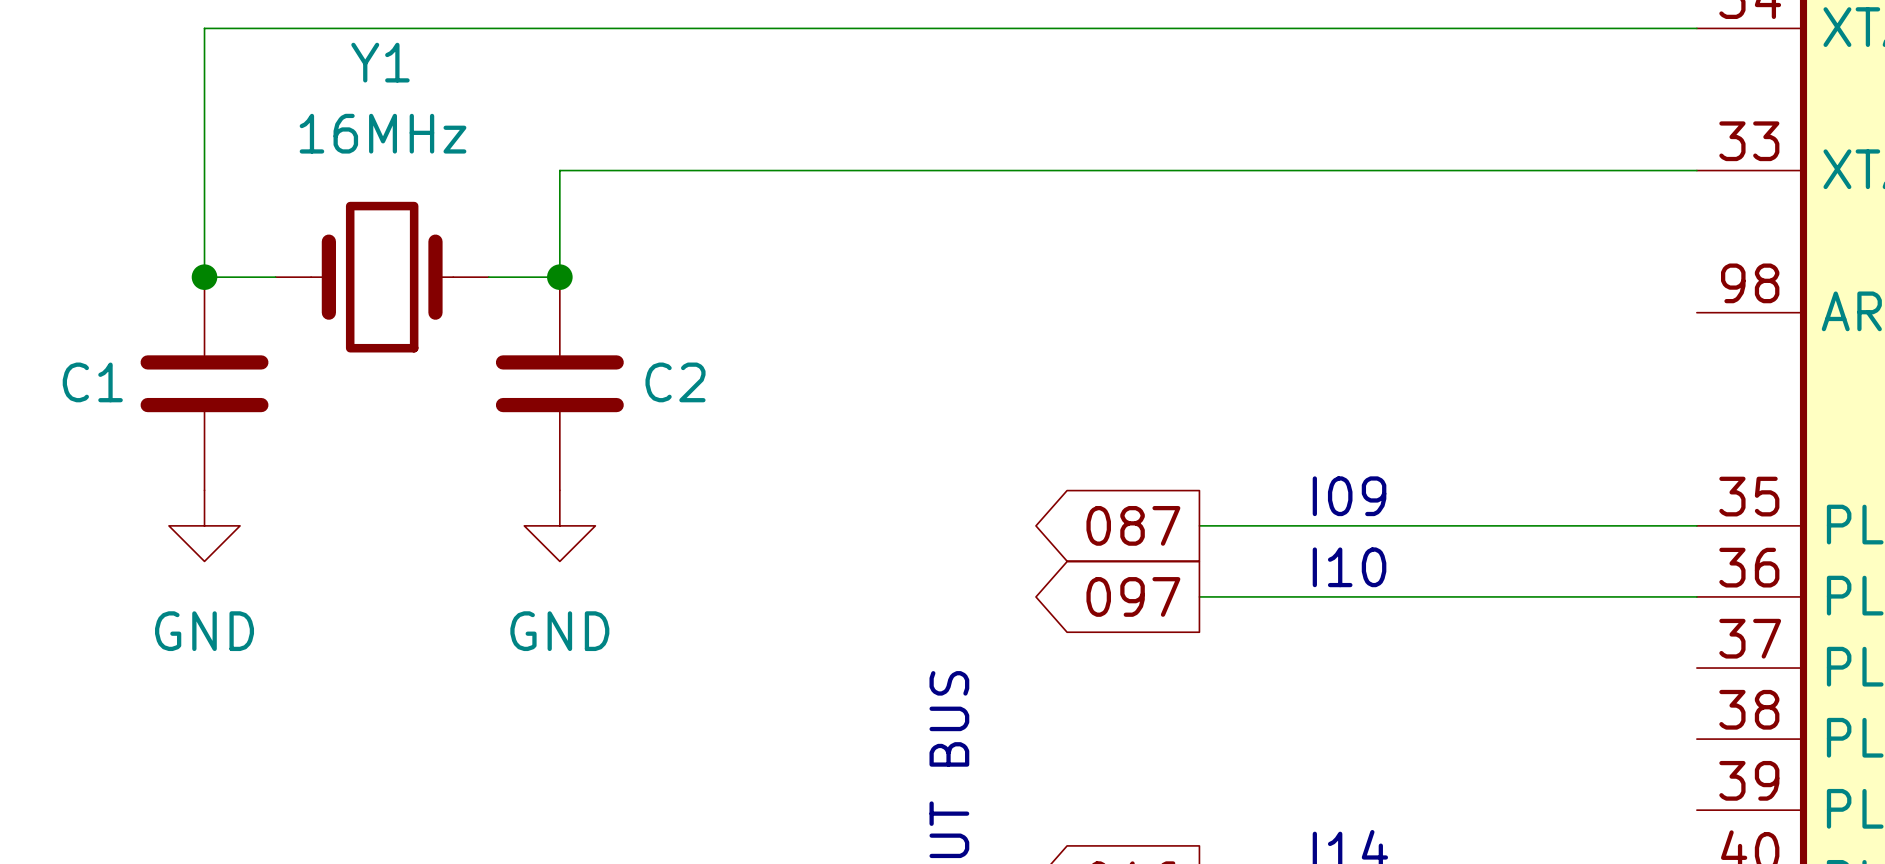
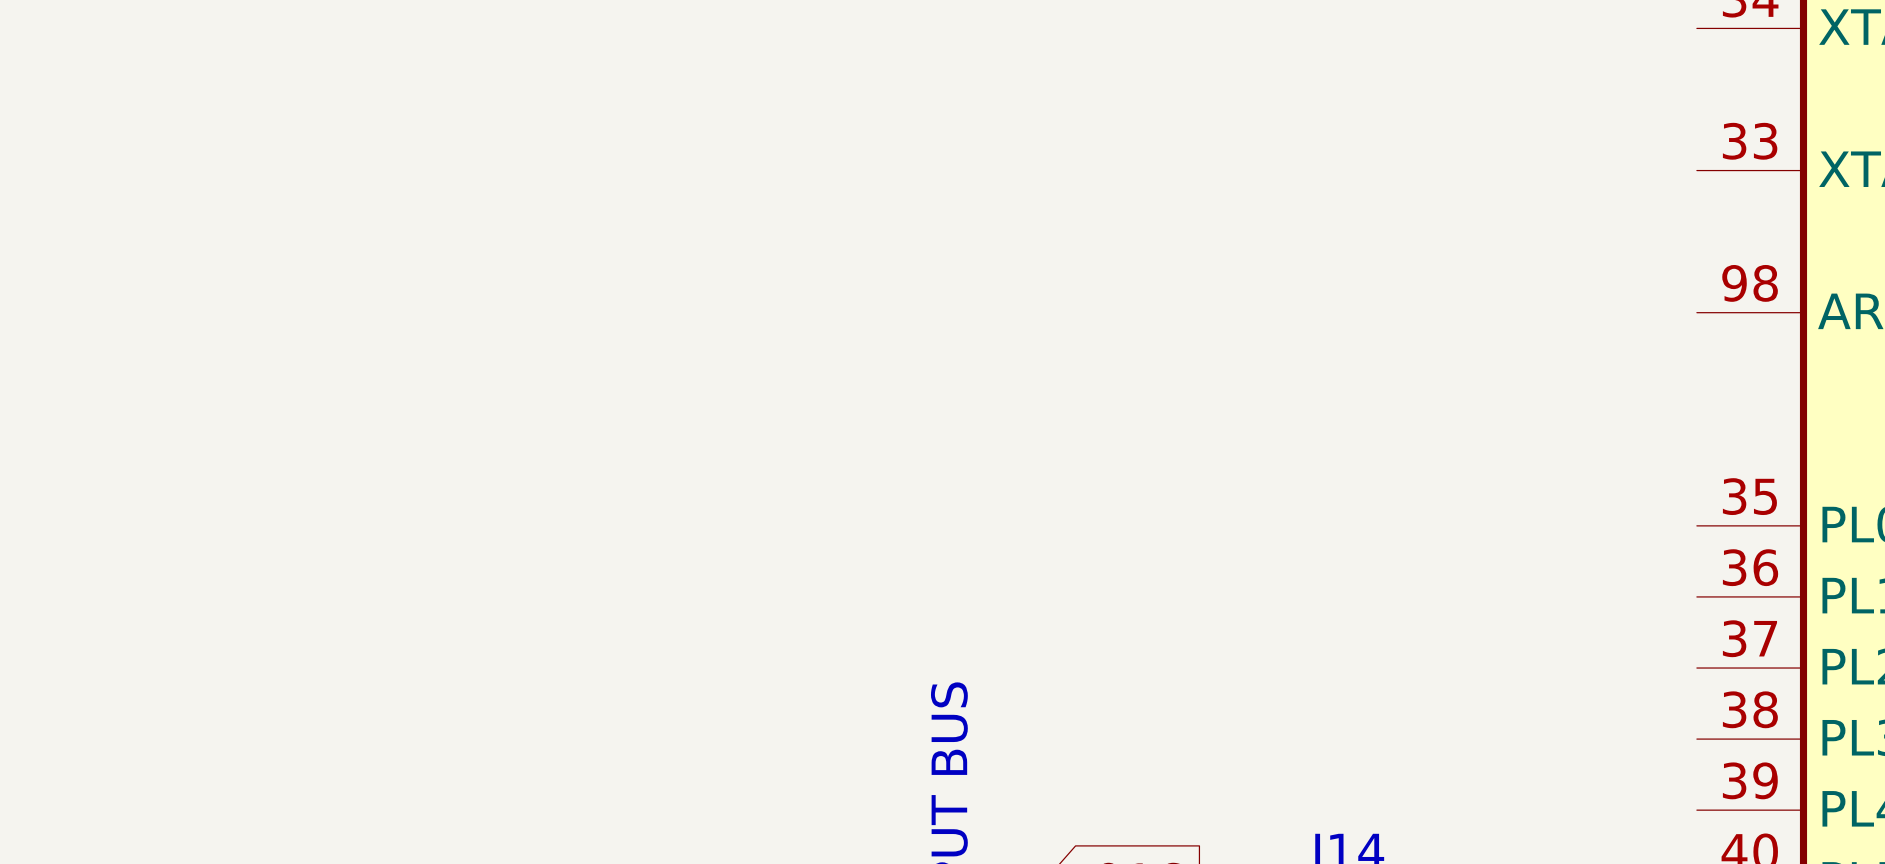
wire: (1696, 28) (204, 28) (204, 277) (275, 277) -> none
wire: (1696, 170) (559, 170) (559, 277) (488, 277) -> none
junction: (204, 277) -> none
Y1: 16MHz (382, 277) -> none
junction: (559, 277) -> none
C1: (204, 383) -> none
C2: (559, 383) -> none
text: I09 (1349, 496) -> none
power symbol: GND (204, 525) -> none
power symbol: GND (559, 525) -> none
global label: 087 (1133, 525) -> none
wire: (1199, 525) (1696, 525) -> none
text: I10 (1349, 567) -> none
global label: 097 (1133, 596) -> none
wire: (1199, 596) (1696, 596) -> none

